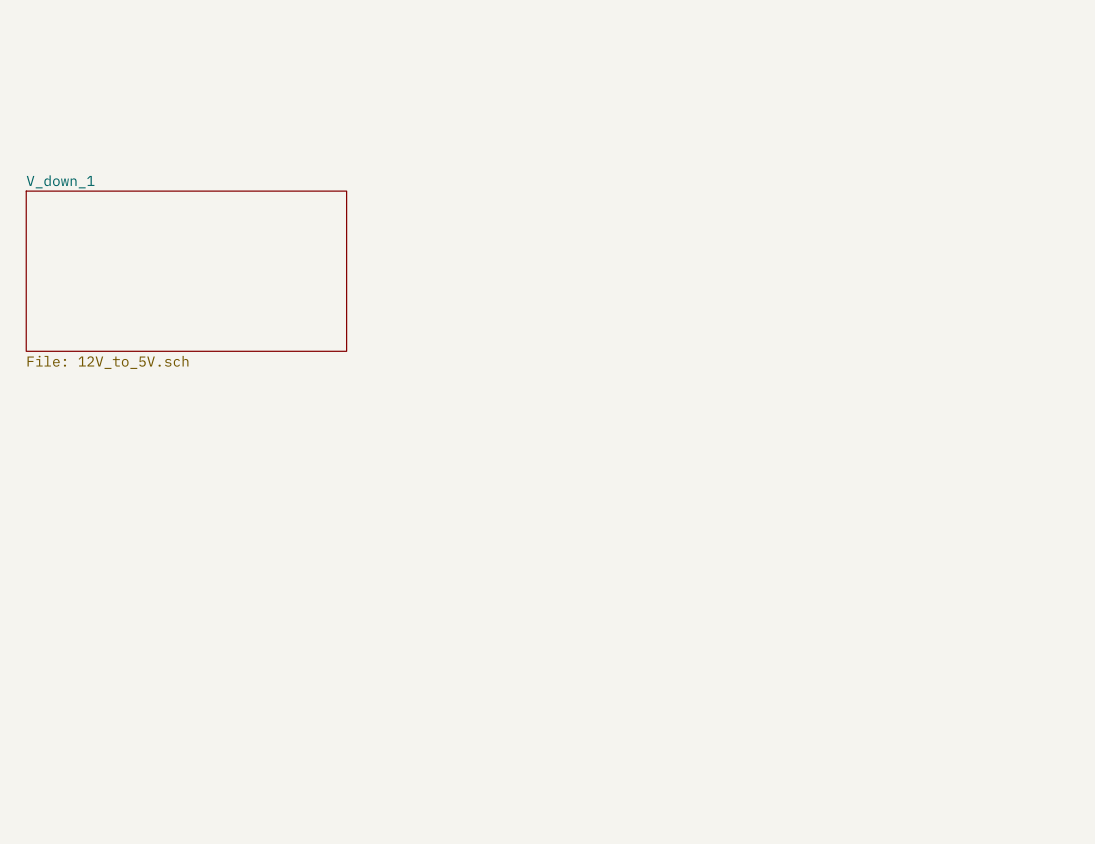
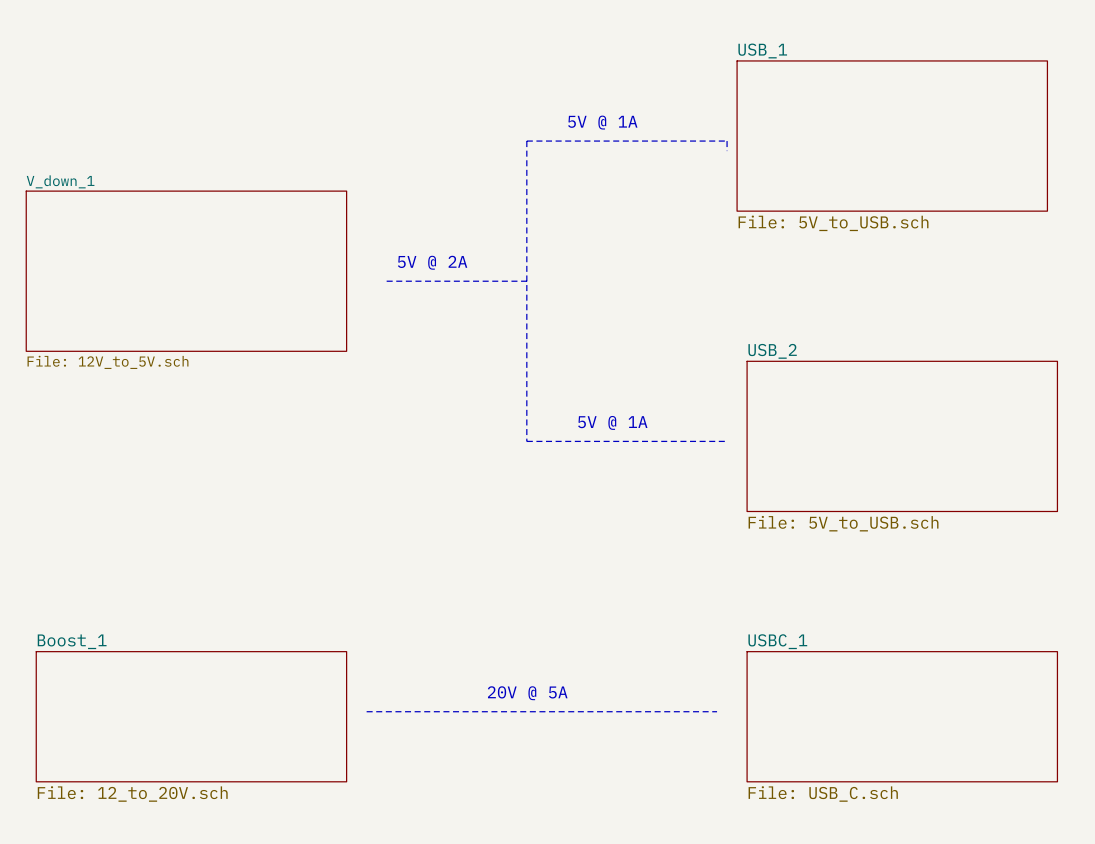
text: none -> 5V @ 1A (602, 122)
sheet USB_1: none -> File: 5V_to_USB.sch (892, 136)
line: none -> (727, 151) (727, 141) (526, 141) (526, 441) (727, 441)
text: none -> 5V @ 2A (432, 262)
line: none -> (386, 281) (526, 281)
text: none -> 5V @ 1A (612, 422)
sheet USB_2: none -> File: 5V_to_USB.sch (902, 436)
text: none -> 20V @ 5A (527, 693)
line: none -> (366, 711) (717, 711)
sheet Boost_1: none -> File: 12_to_20V.sch (191, 716)
sheet USBC_1: none -> File: USB_C.sch (902, 716)

